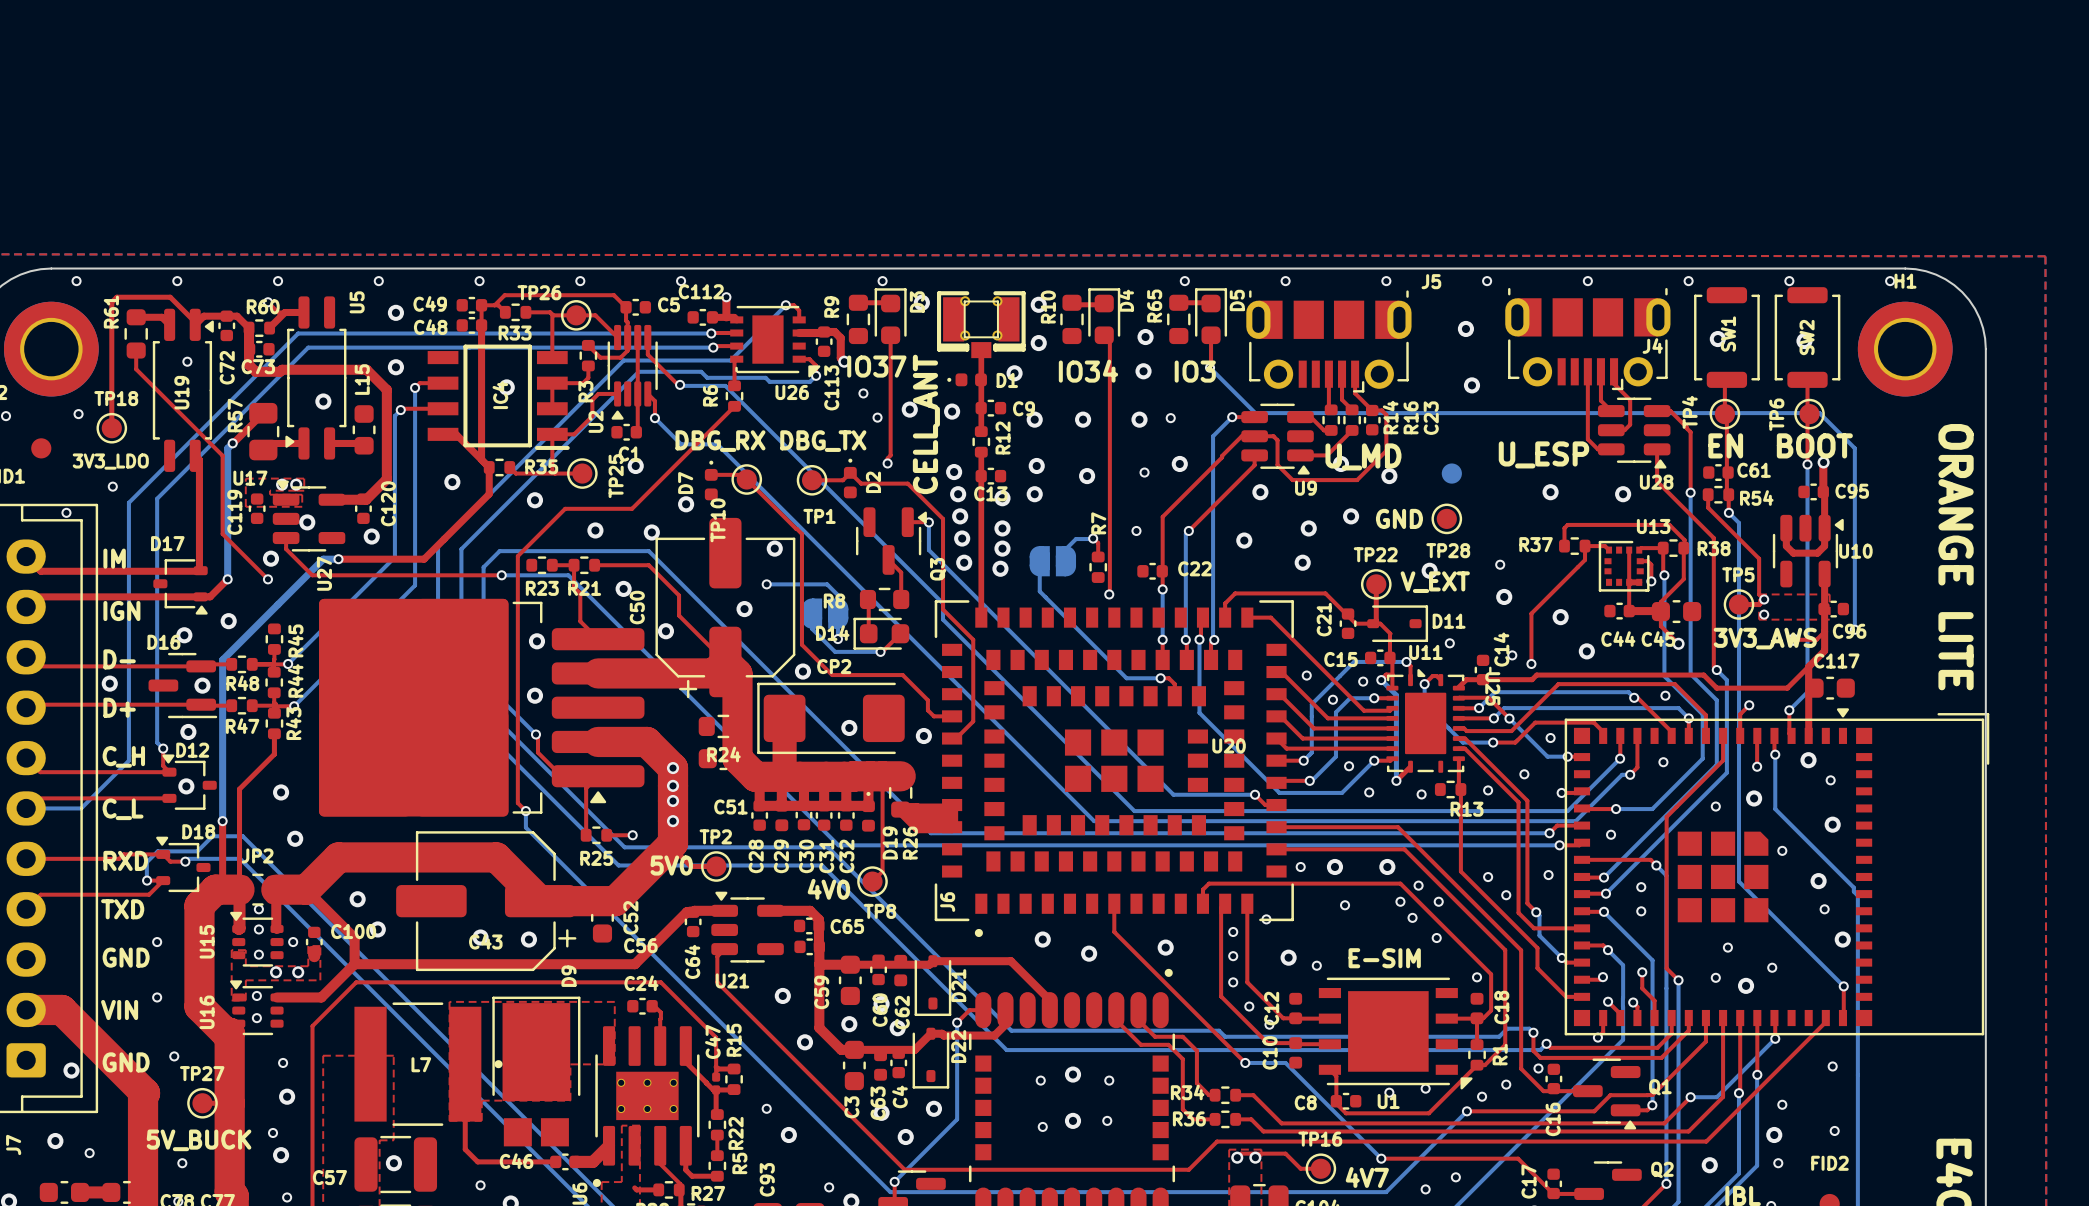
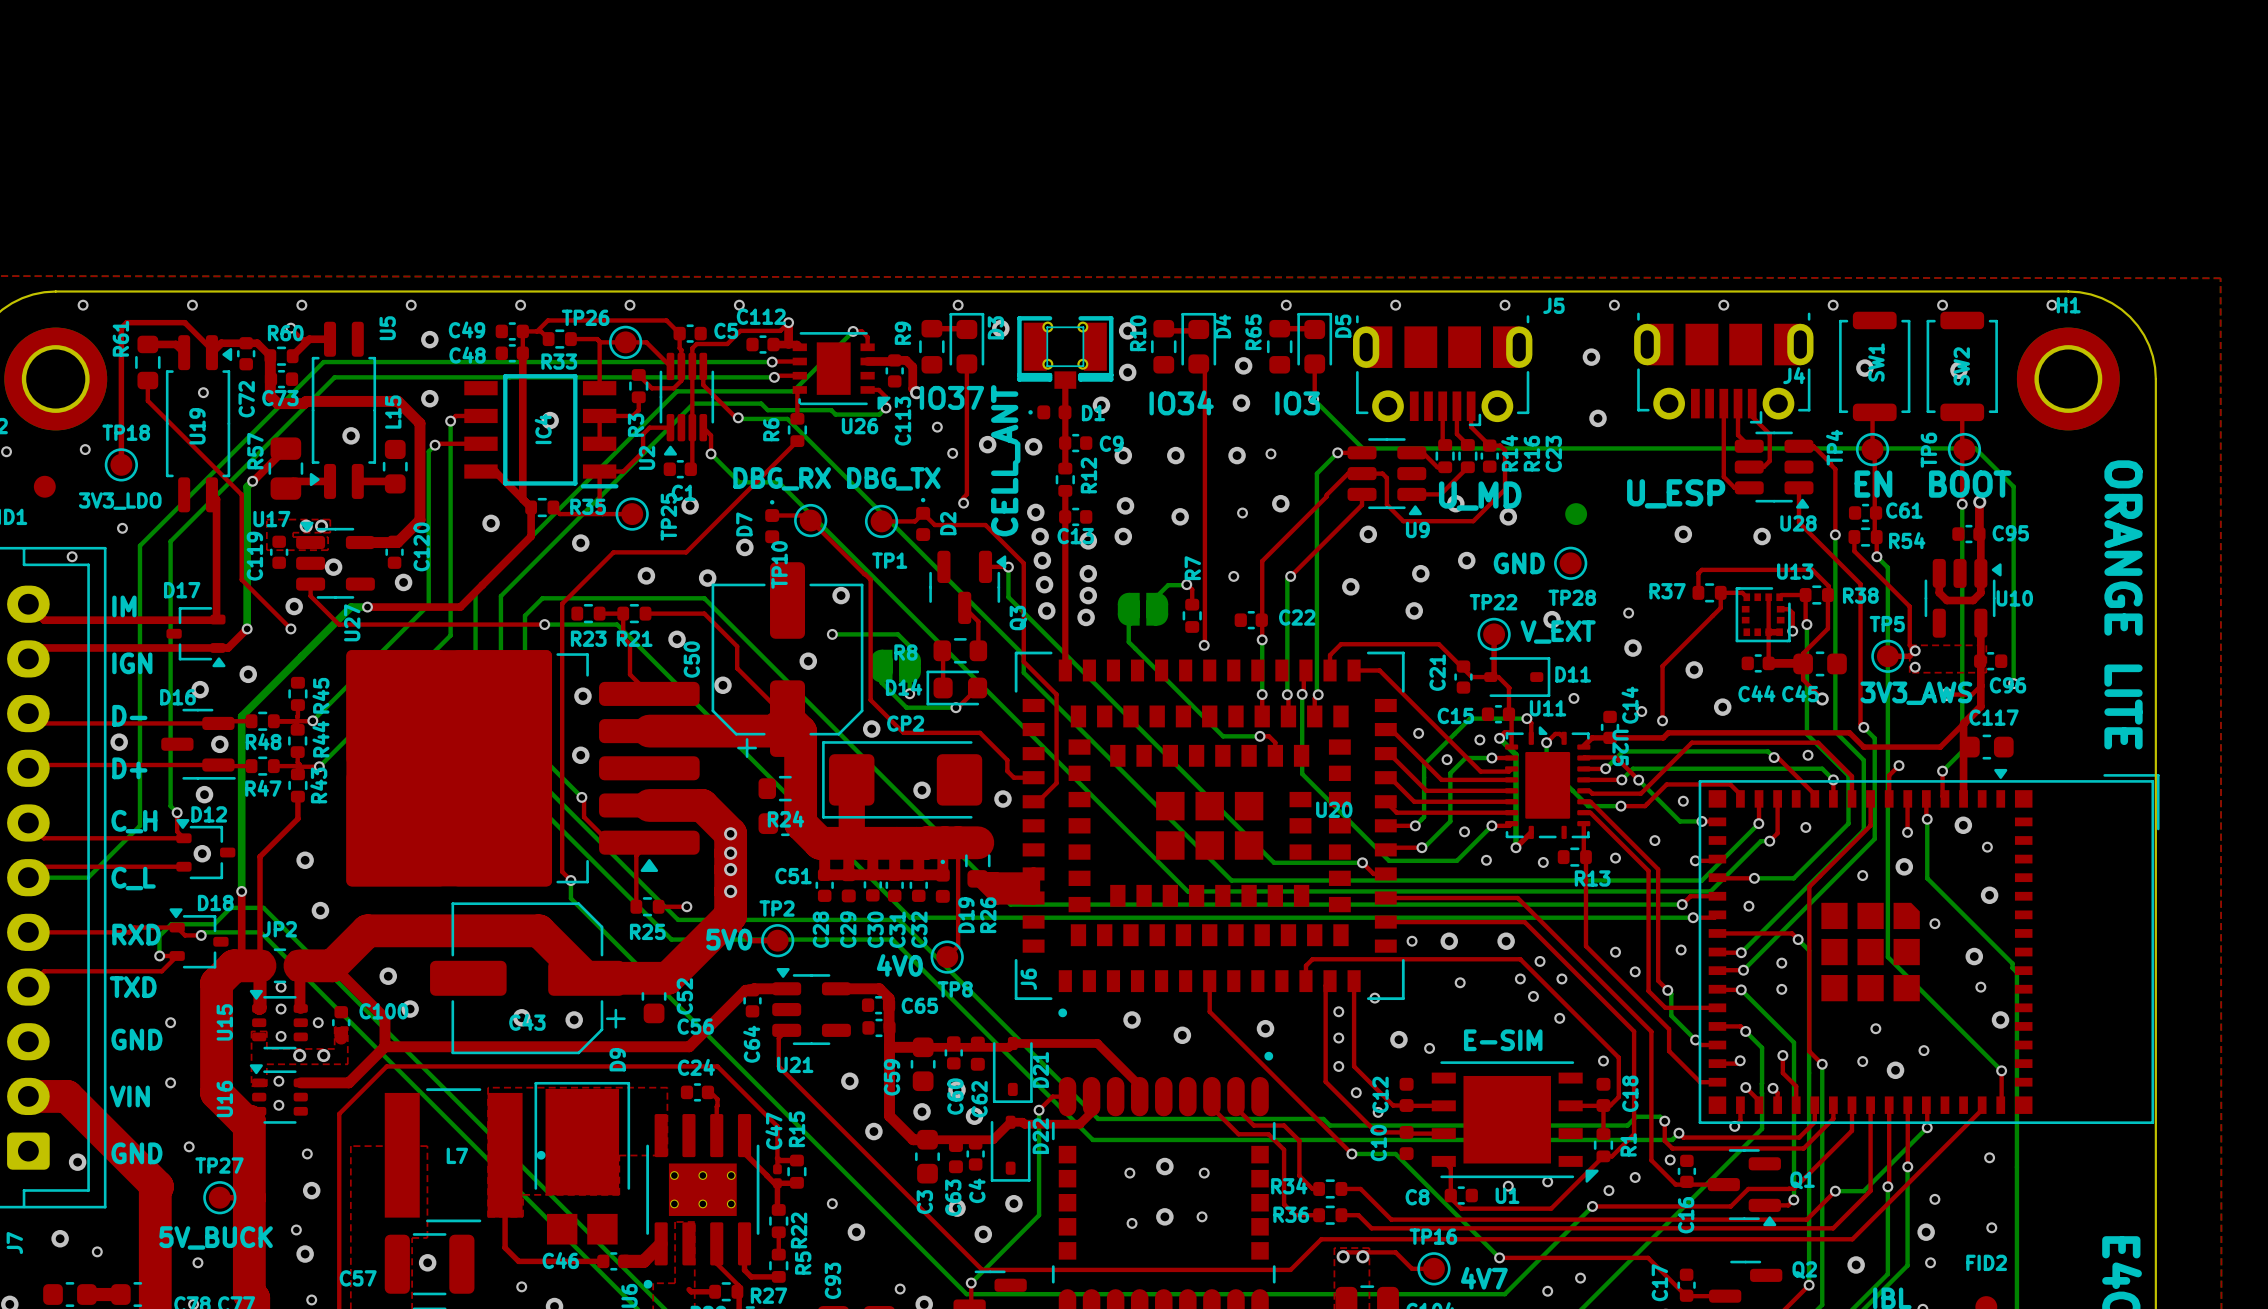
top track: none -> (788, 322) (780, 330) (740, 330) (727, 344) (696, 344) (692, 348) (692, 366)

